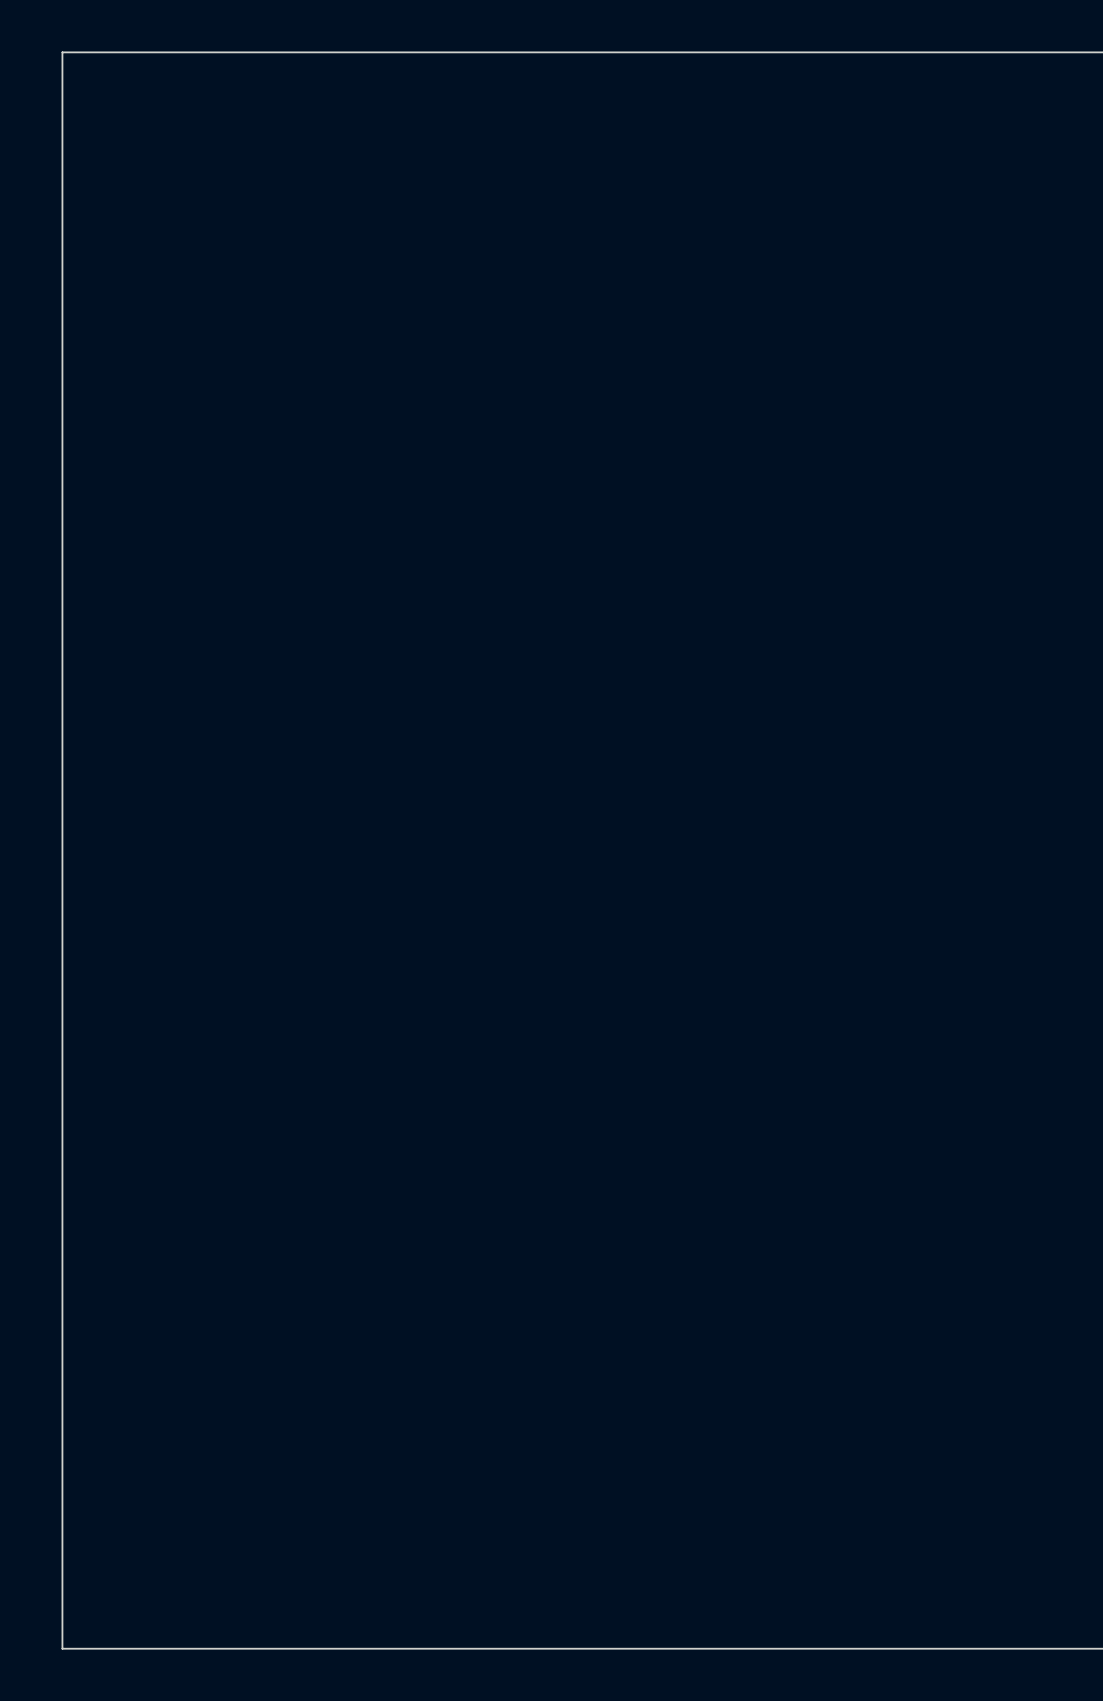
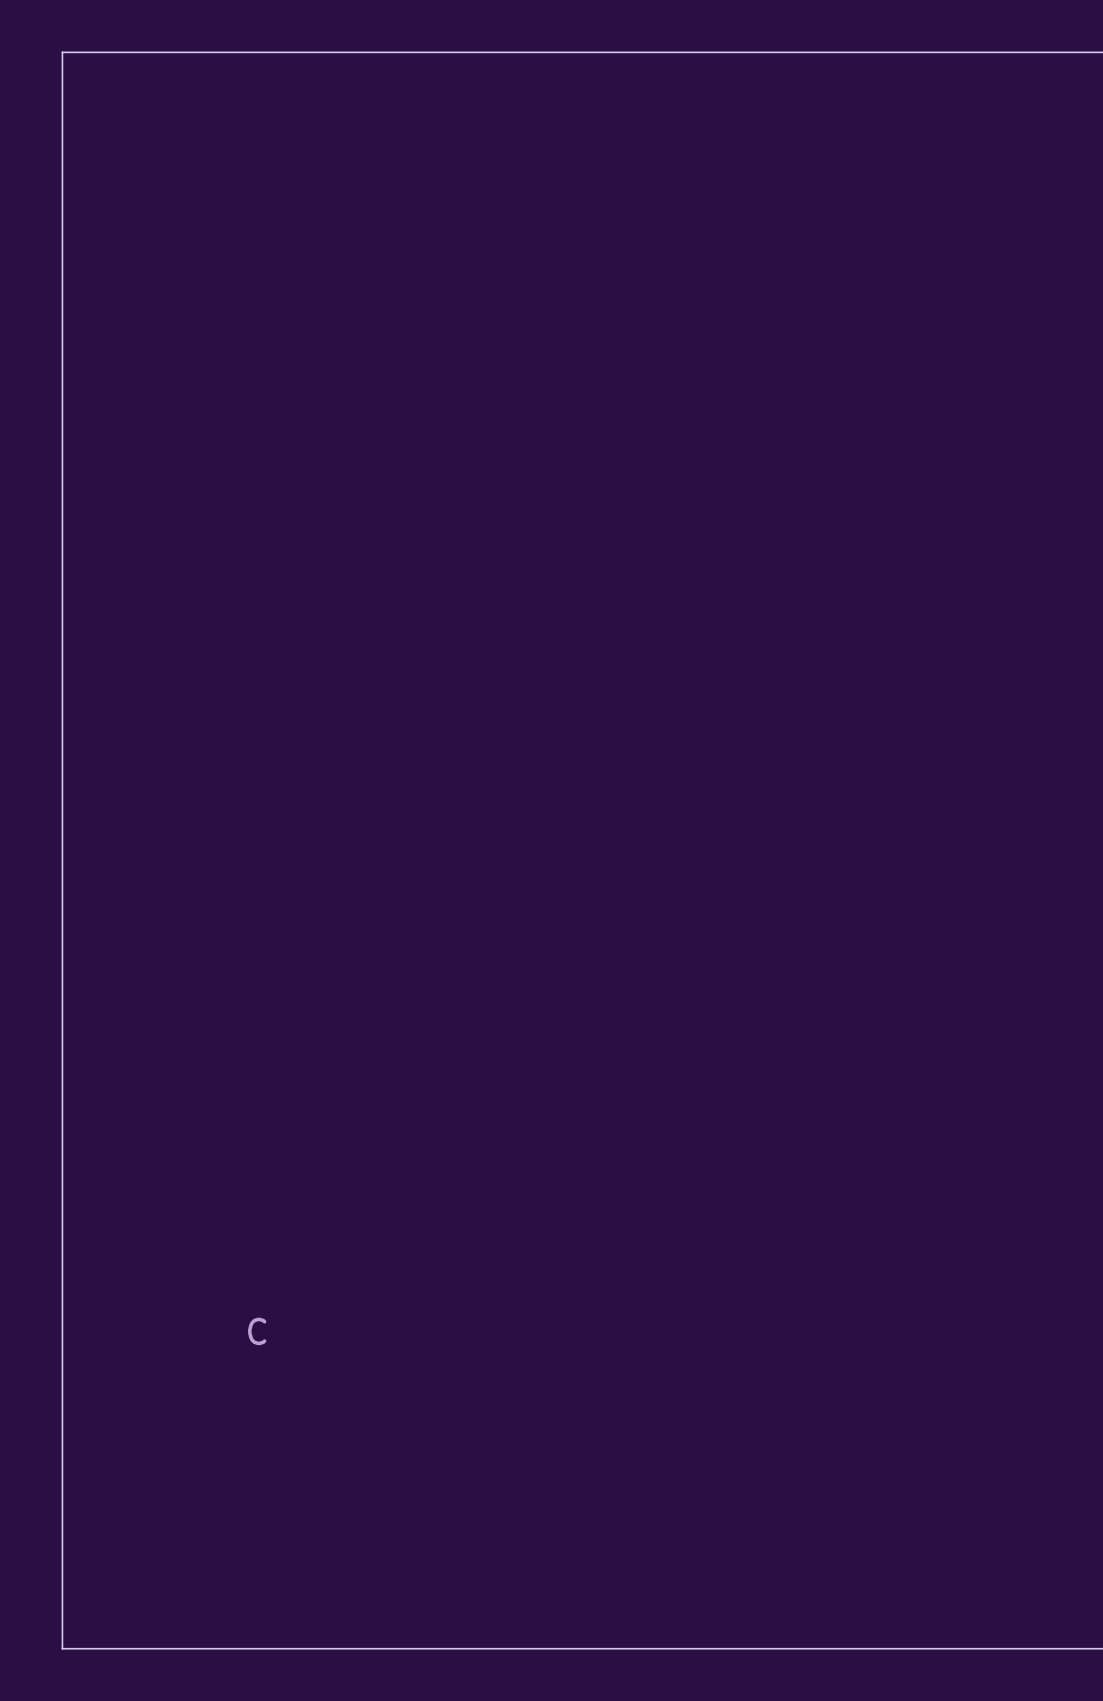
text: none -> C (257, 1331)

